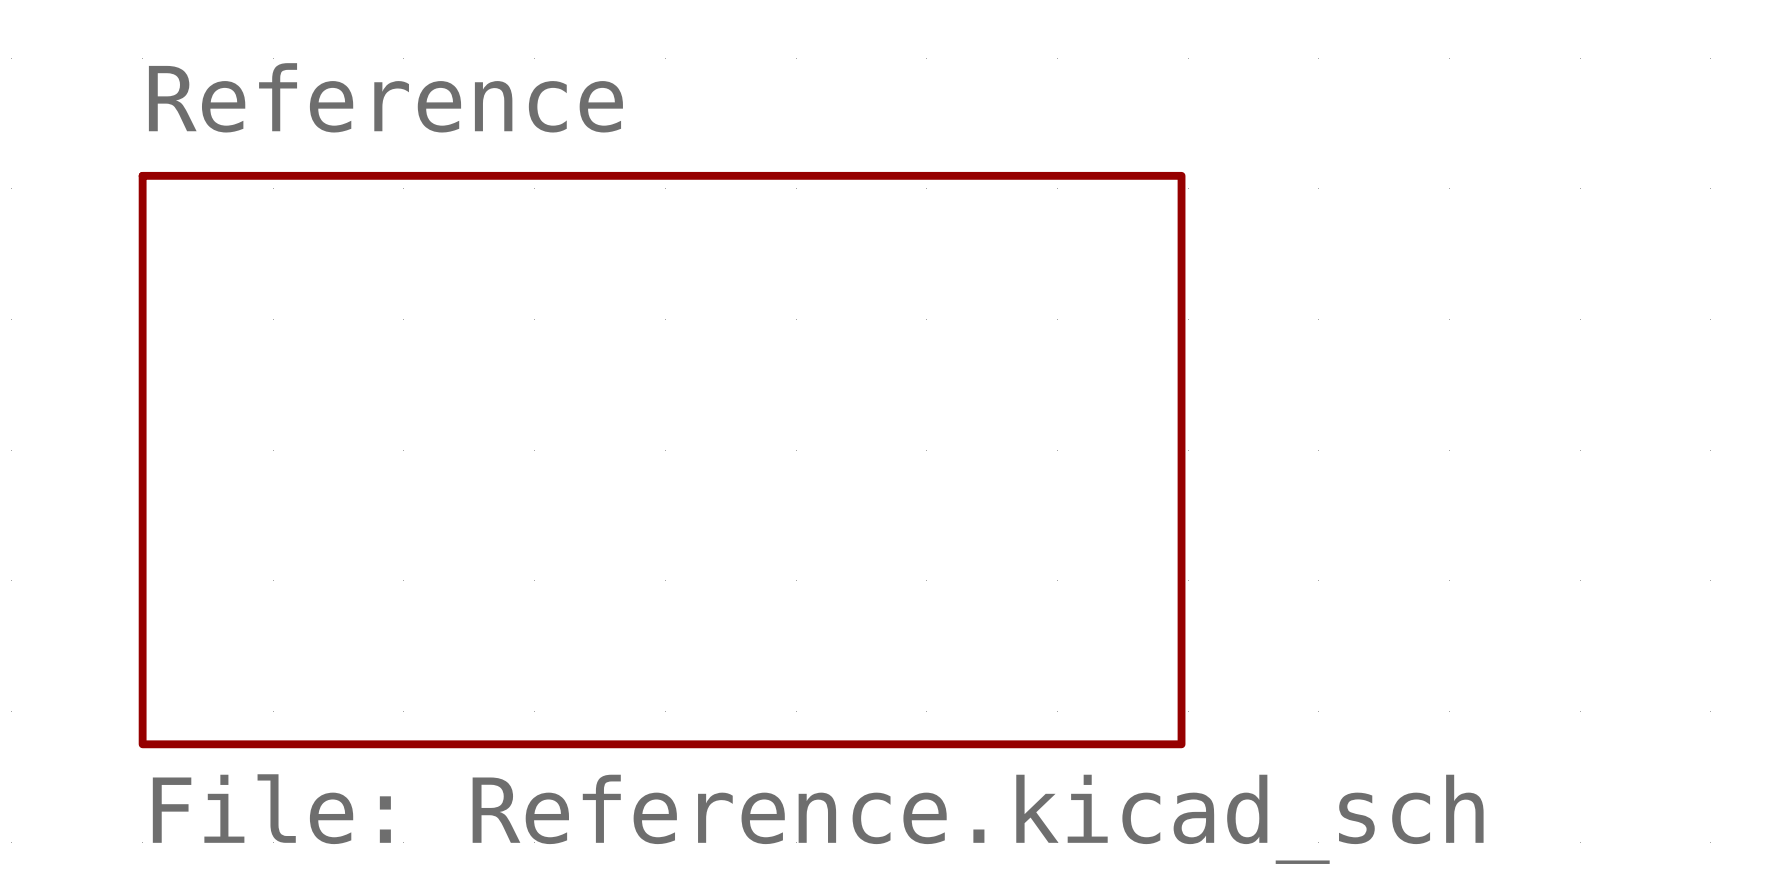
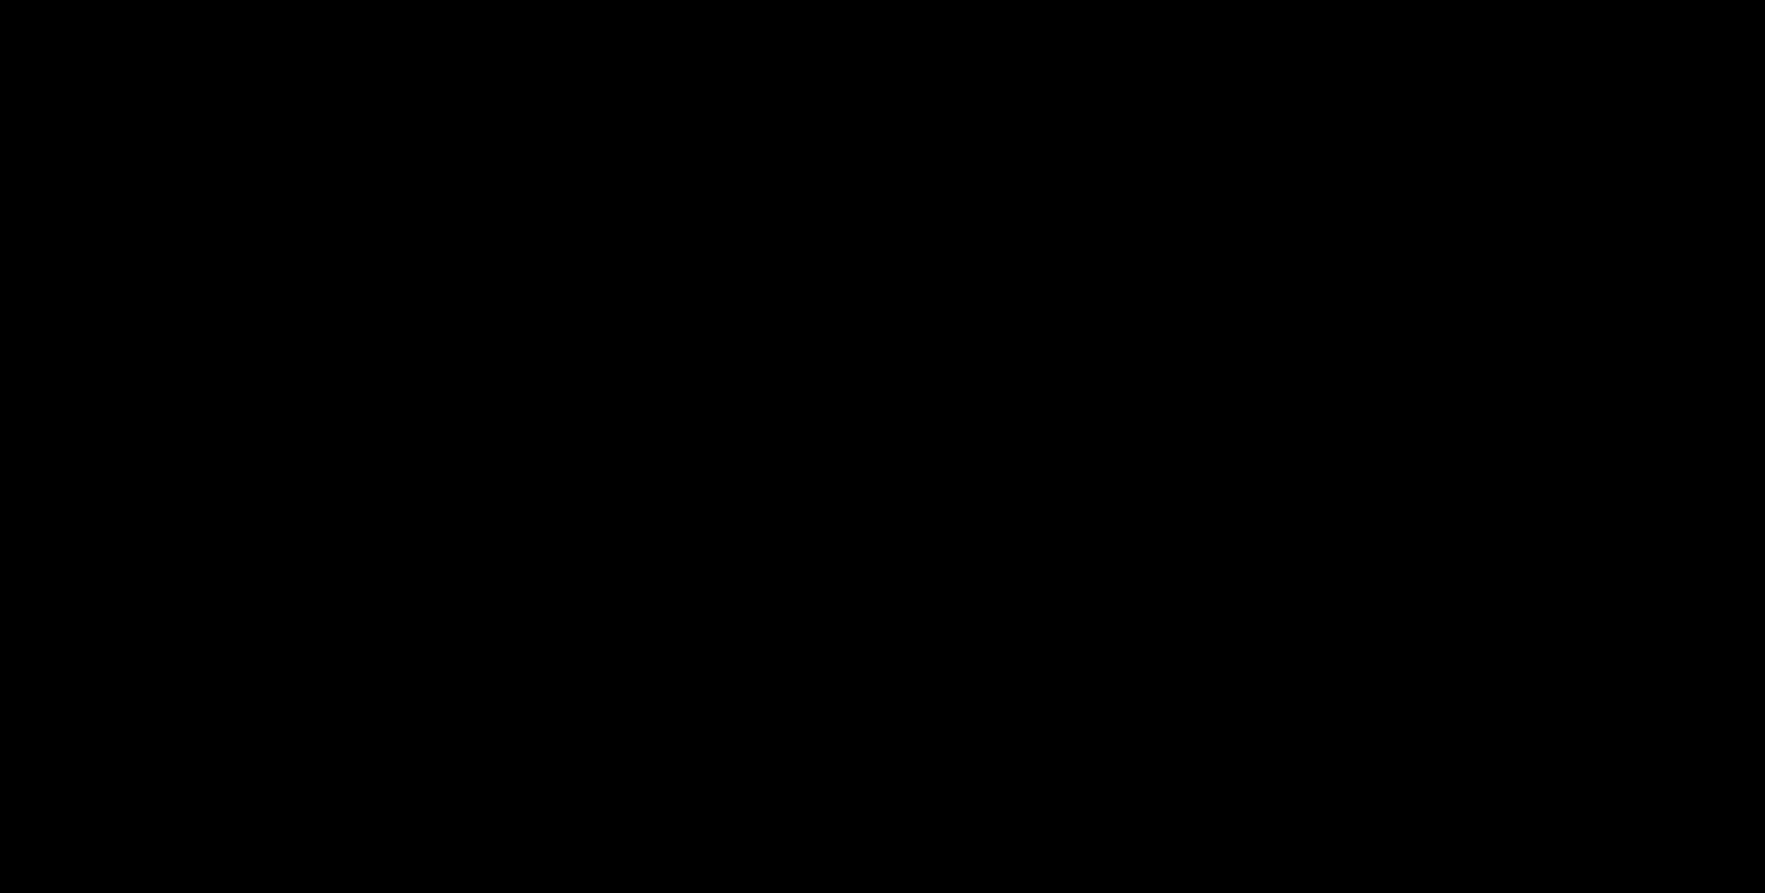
sheet Reference: File: Reference.kicad_sch (662, 460) -> none

